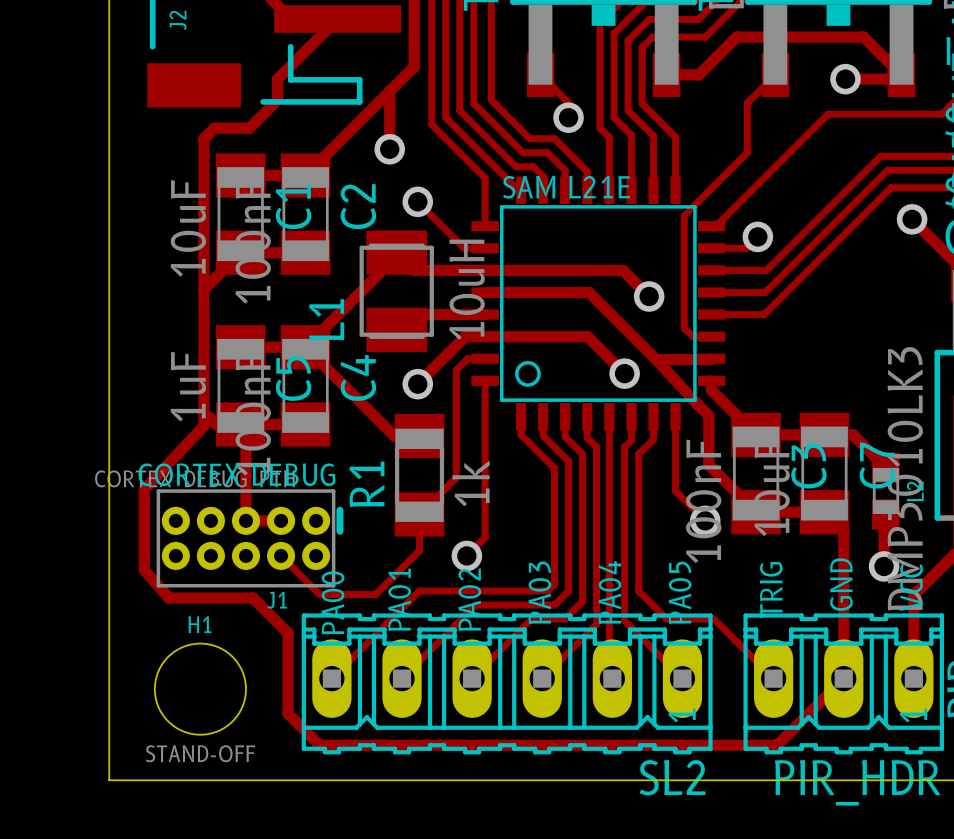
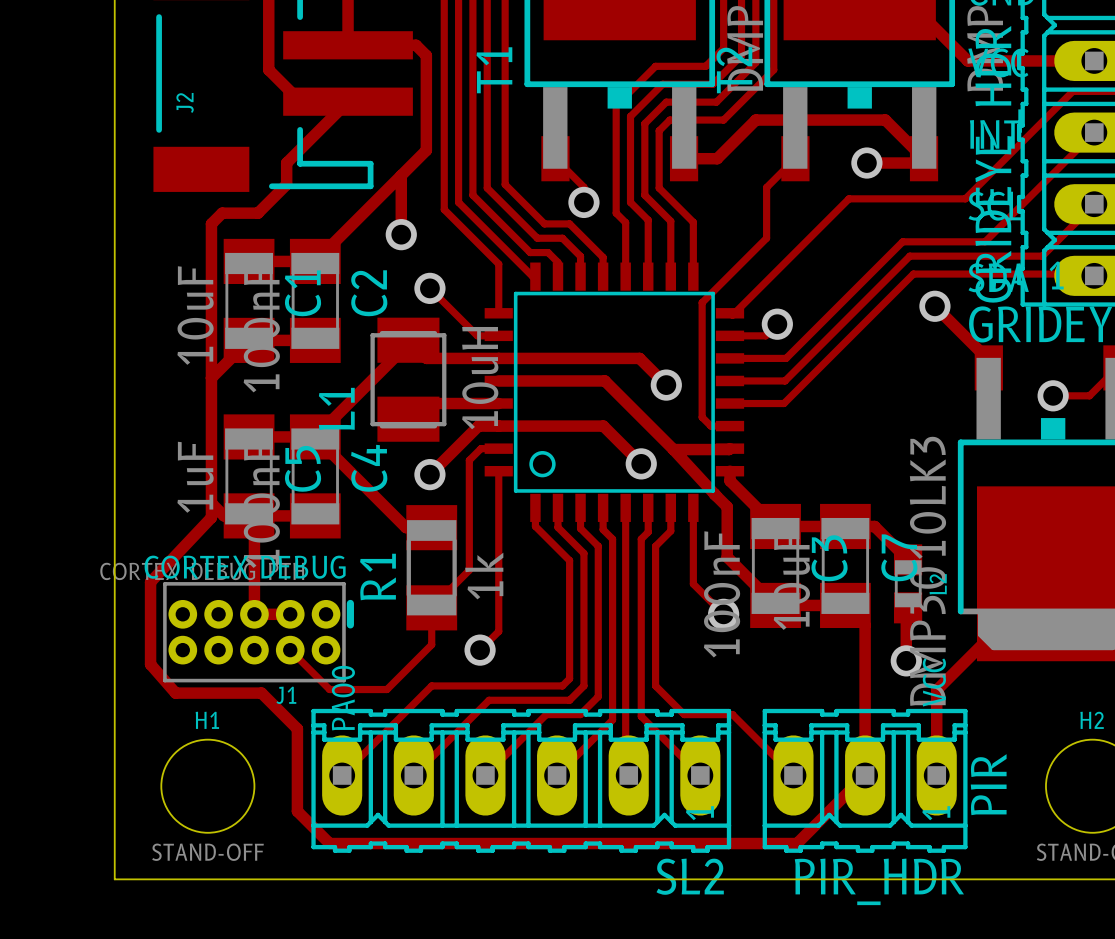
text: SAM L21E (566, 187) -> none
text: GND (841, 584) -> none
text: TRIG (771, 589) -> none
text: PA03 (539, 592) -> none
text: PA04 (610, 592) -> none
text: PA05 (680, 592) -> none
text: PA01 (399, 599) -> none
text: PA02 (469, 599) -> none

